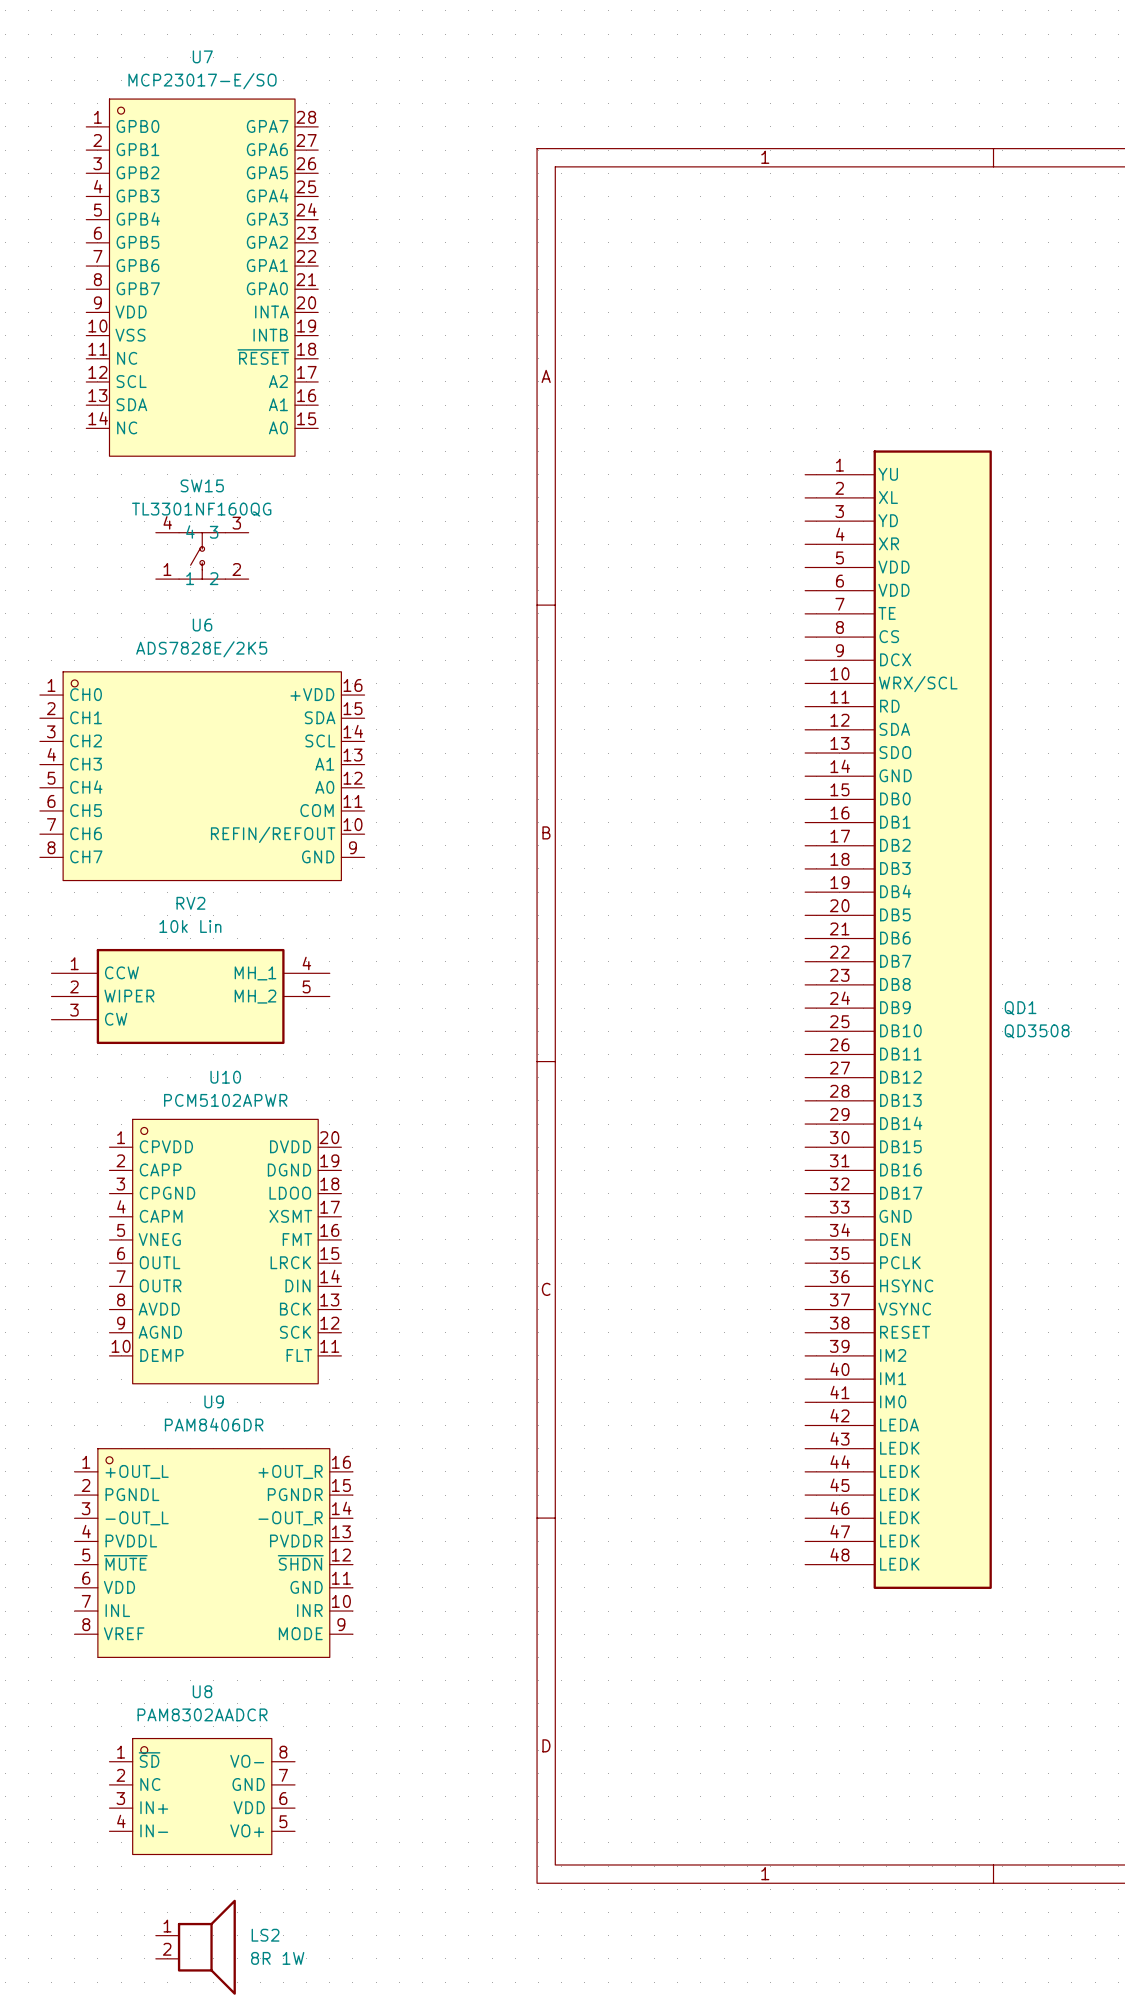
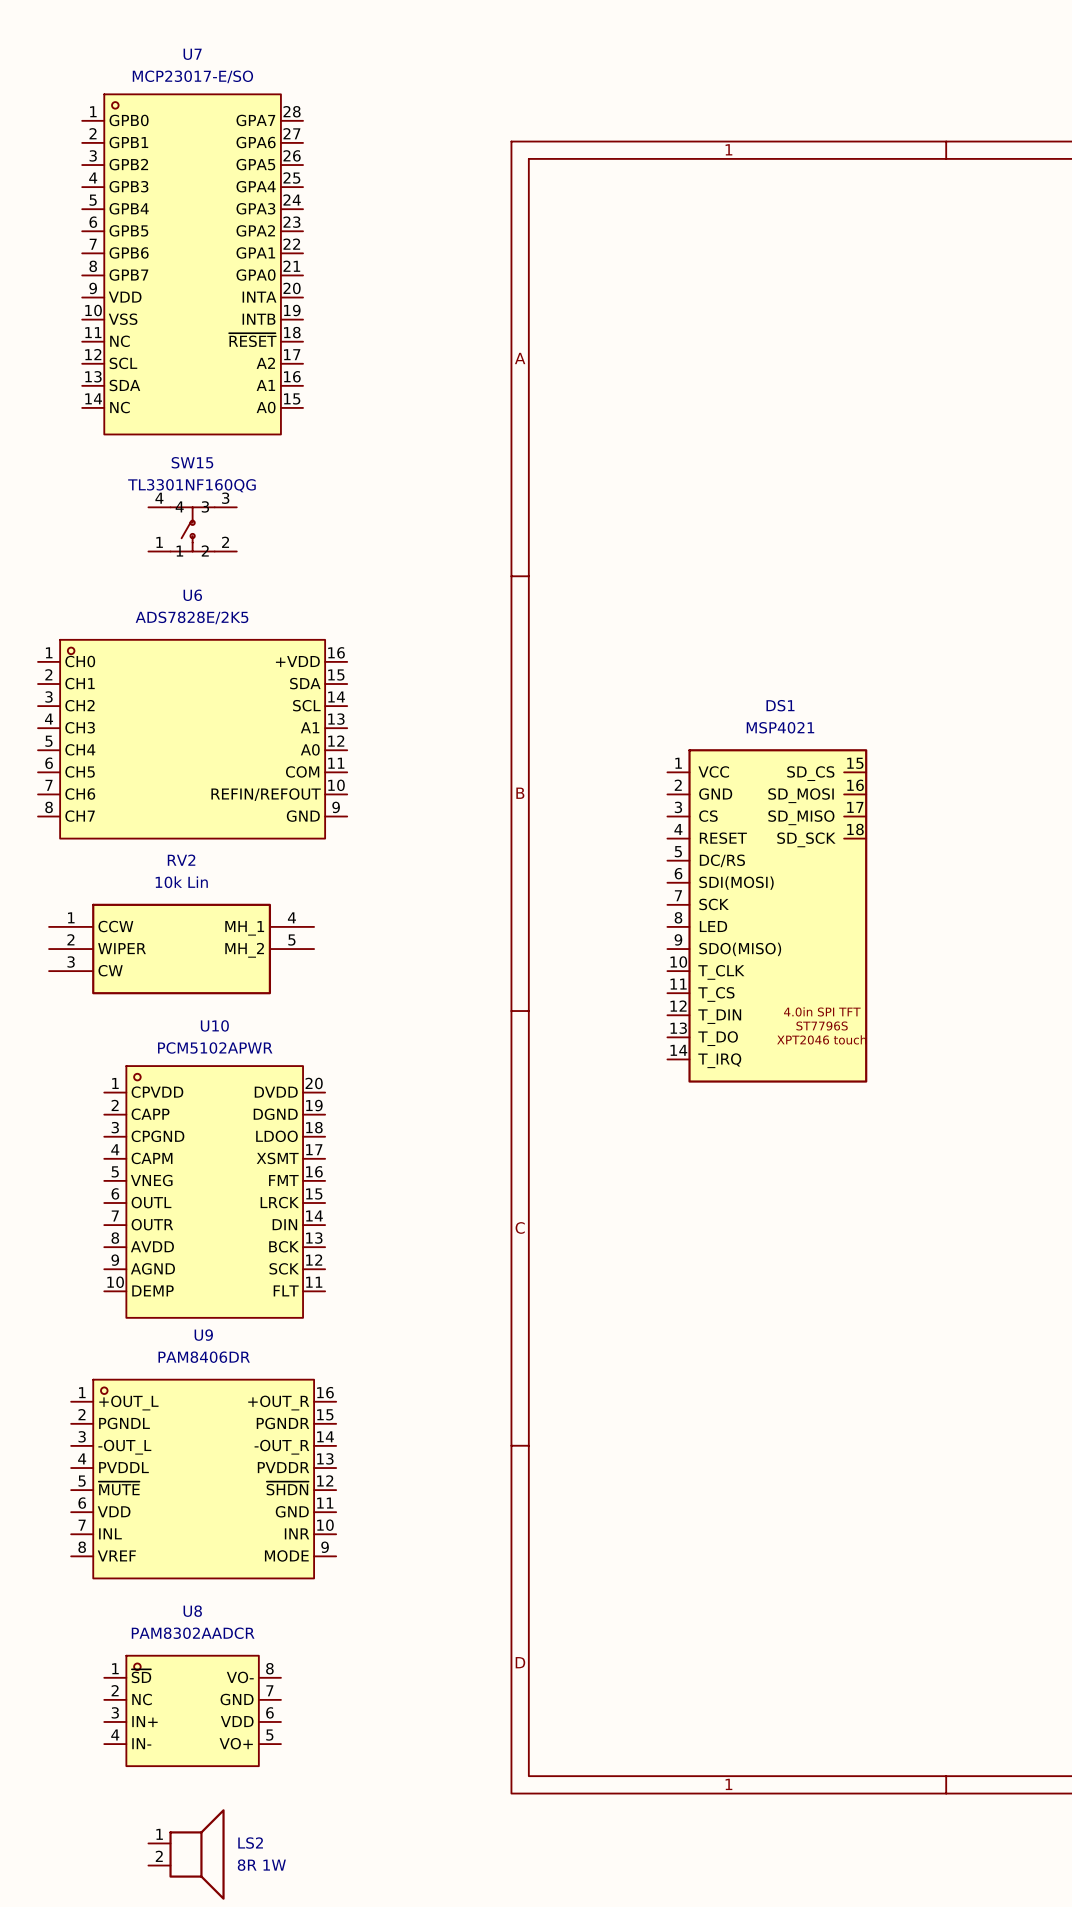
DS1: none -> MSP4021 (767, 915)
QD1: QD3508 (898, 1019) -> none

